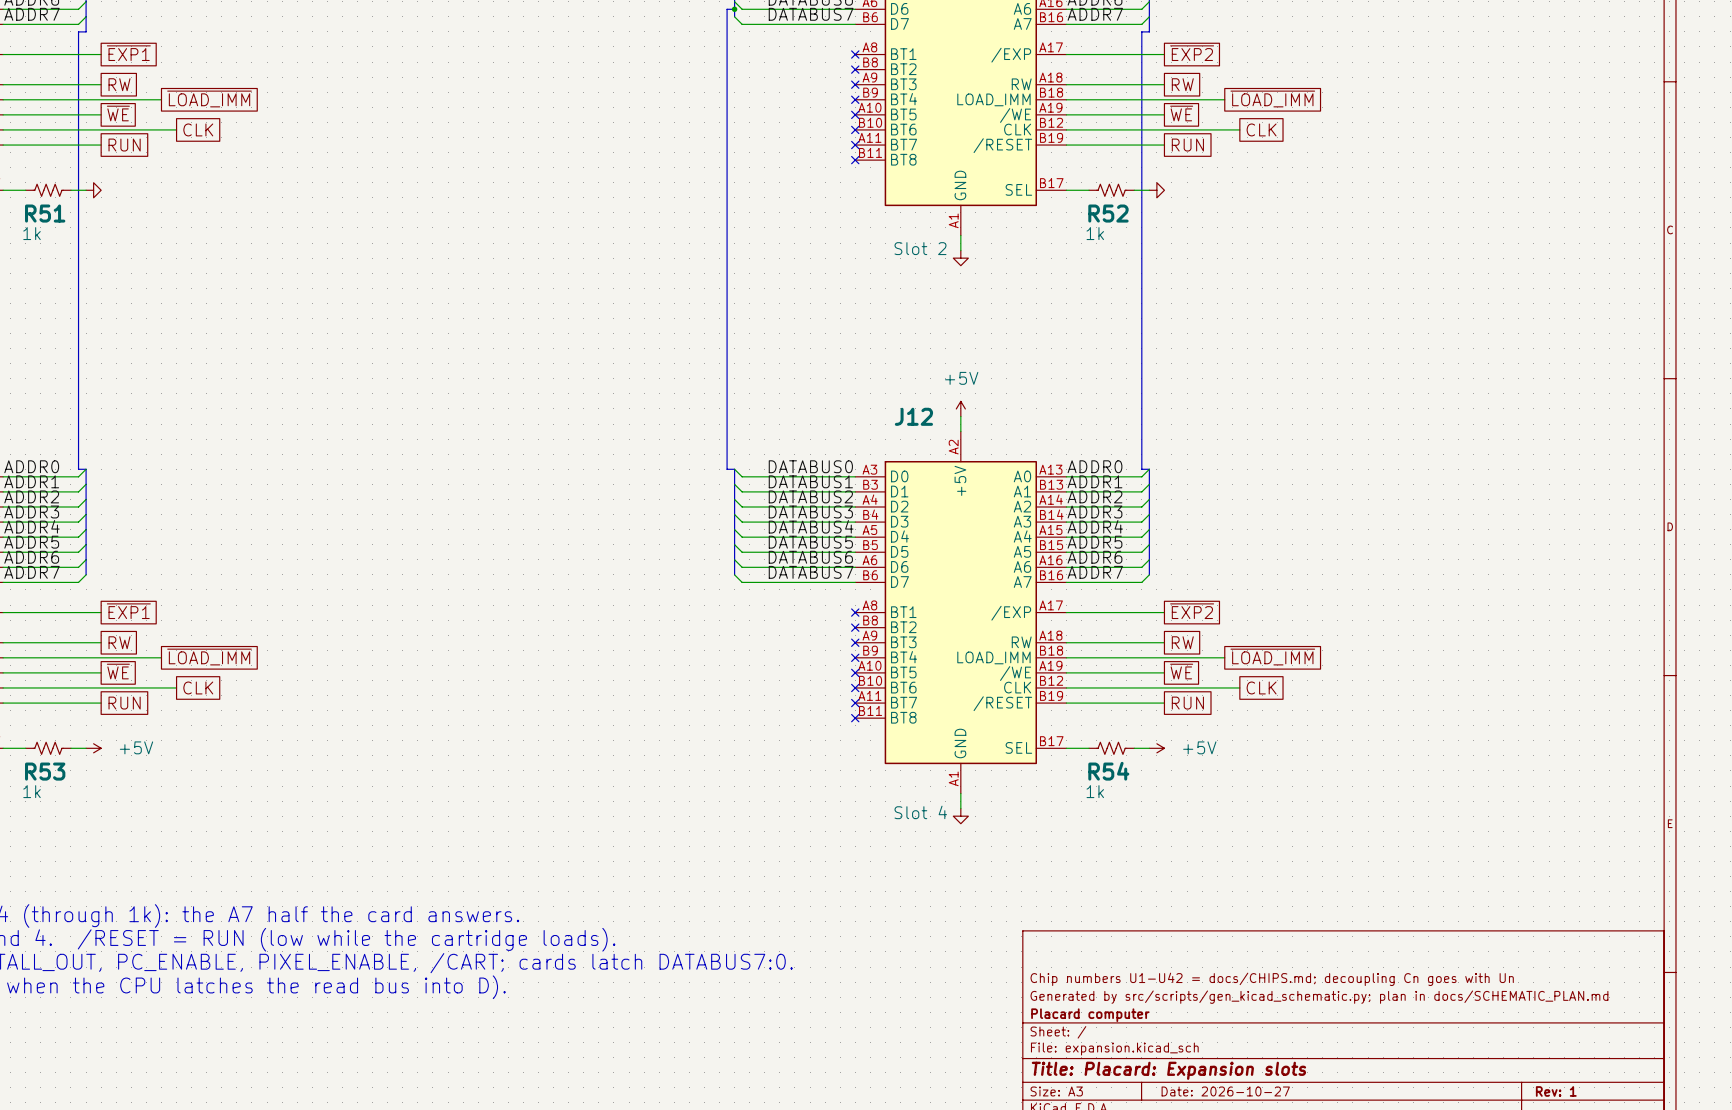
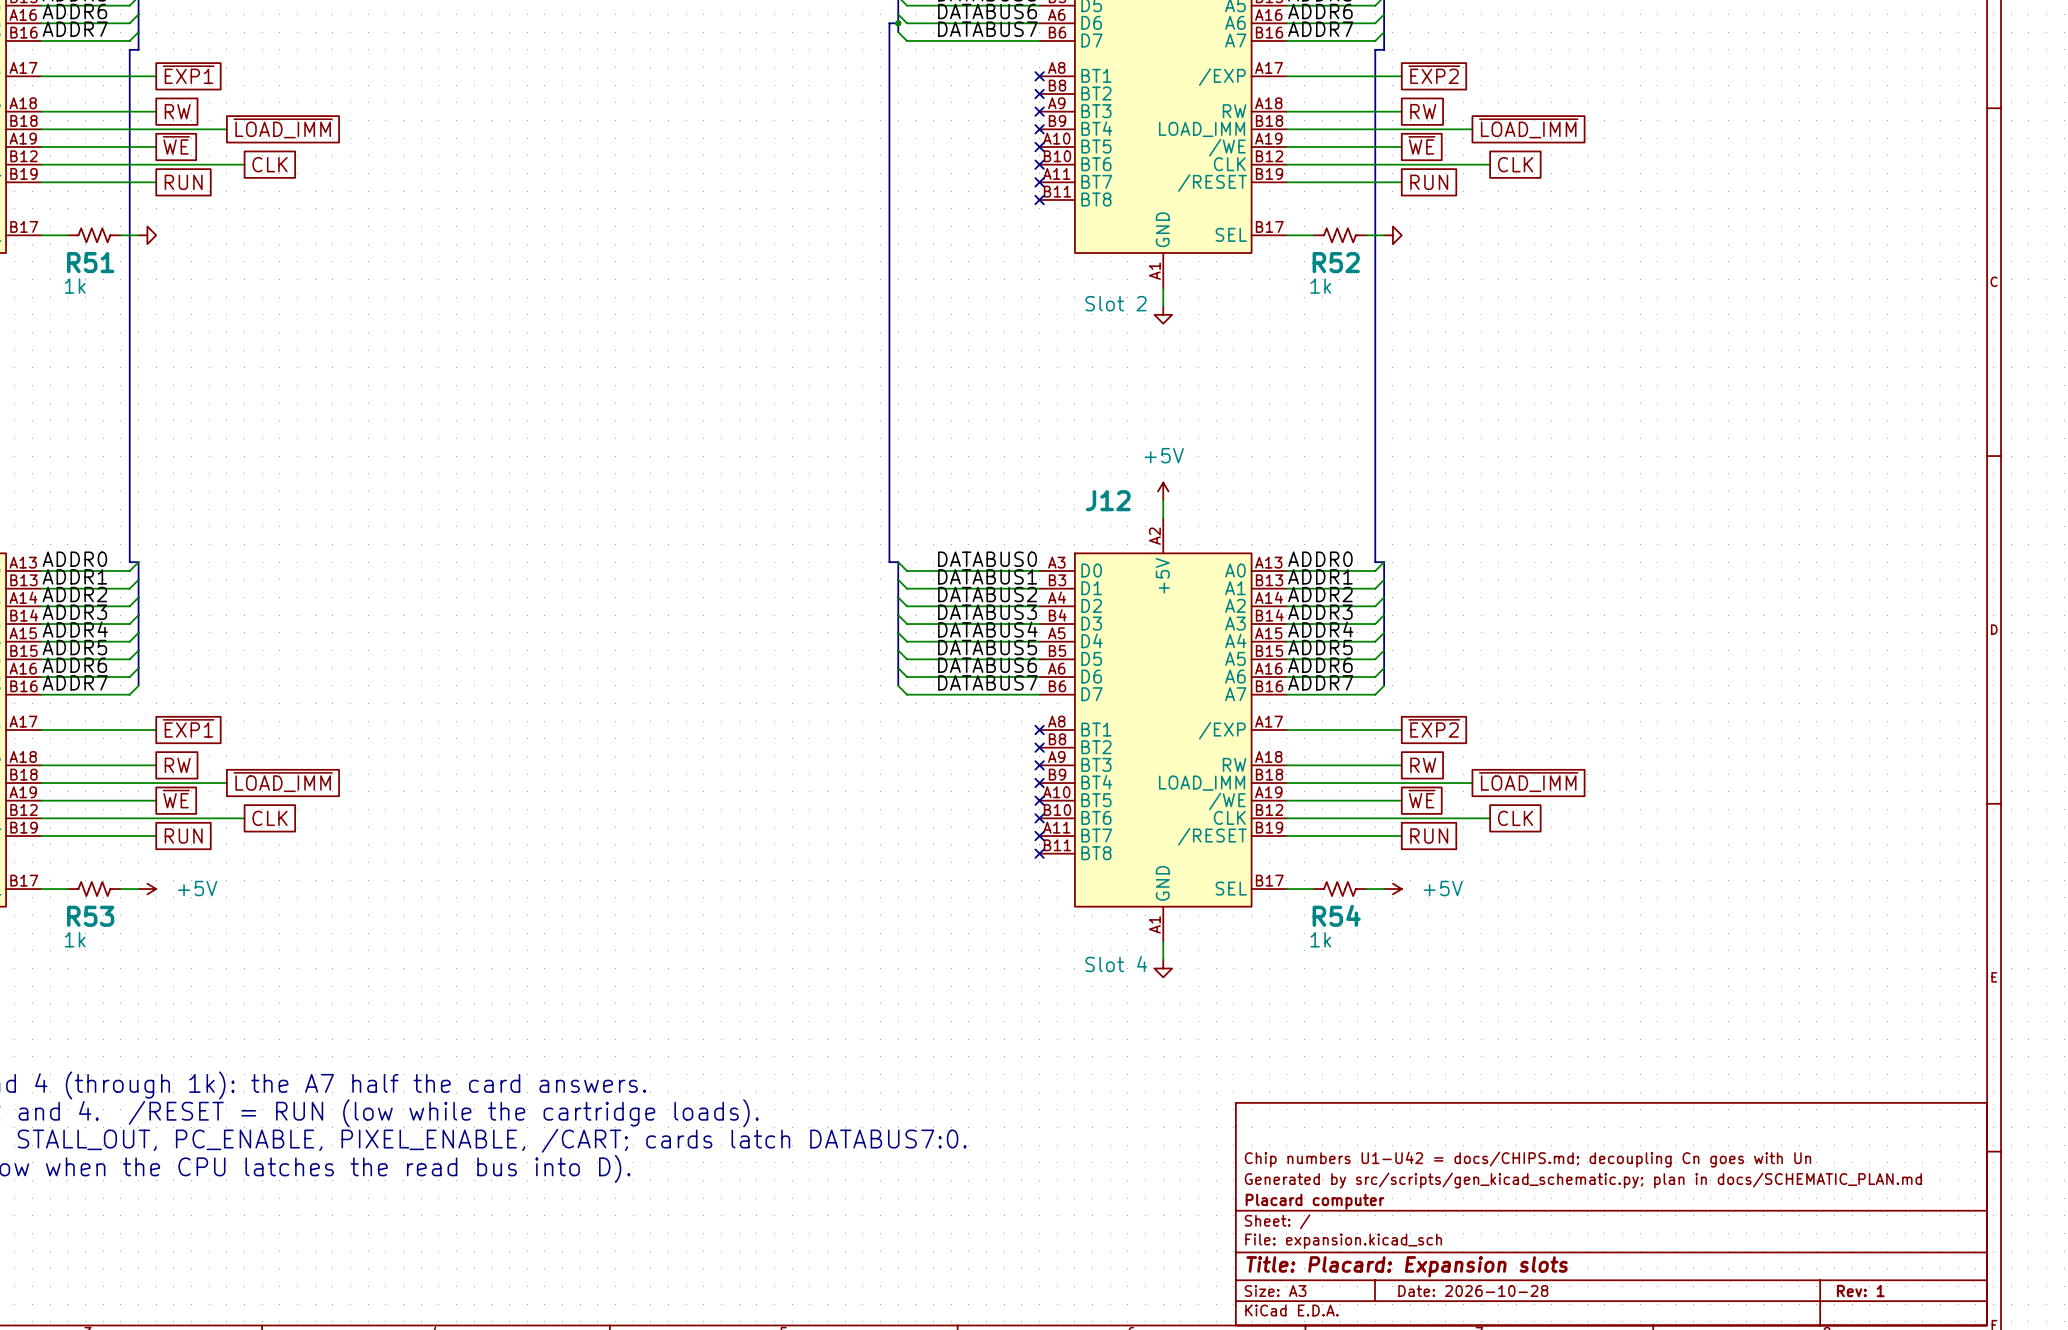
title block: Date: 2026-10-27 (1225, 1091) -> Date: 2026-10-28 (1473, 1291)

